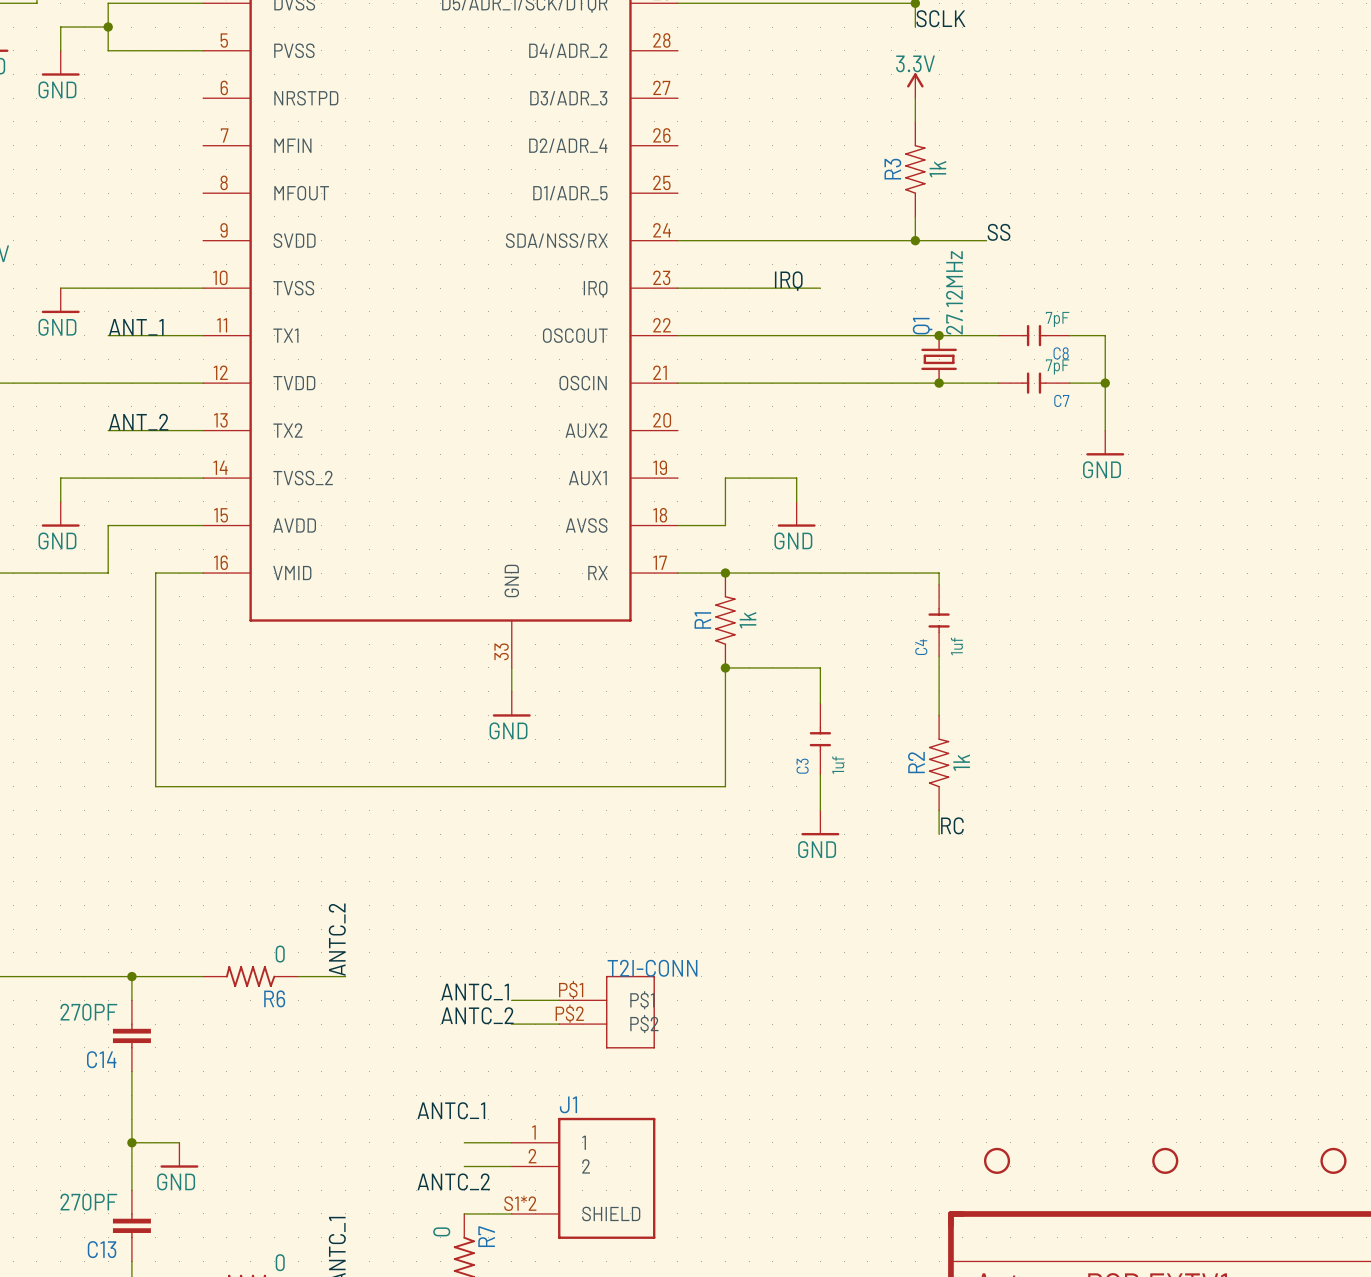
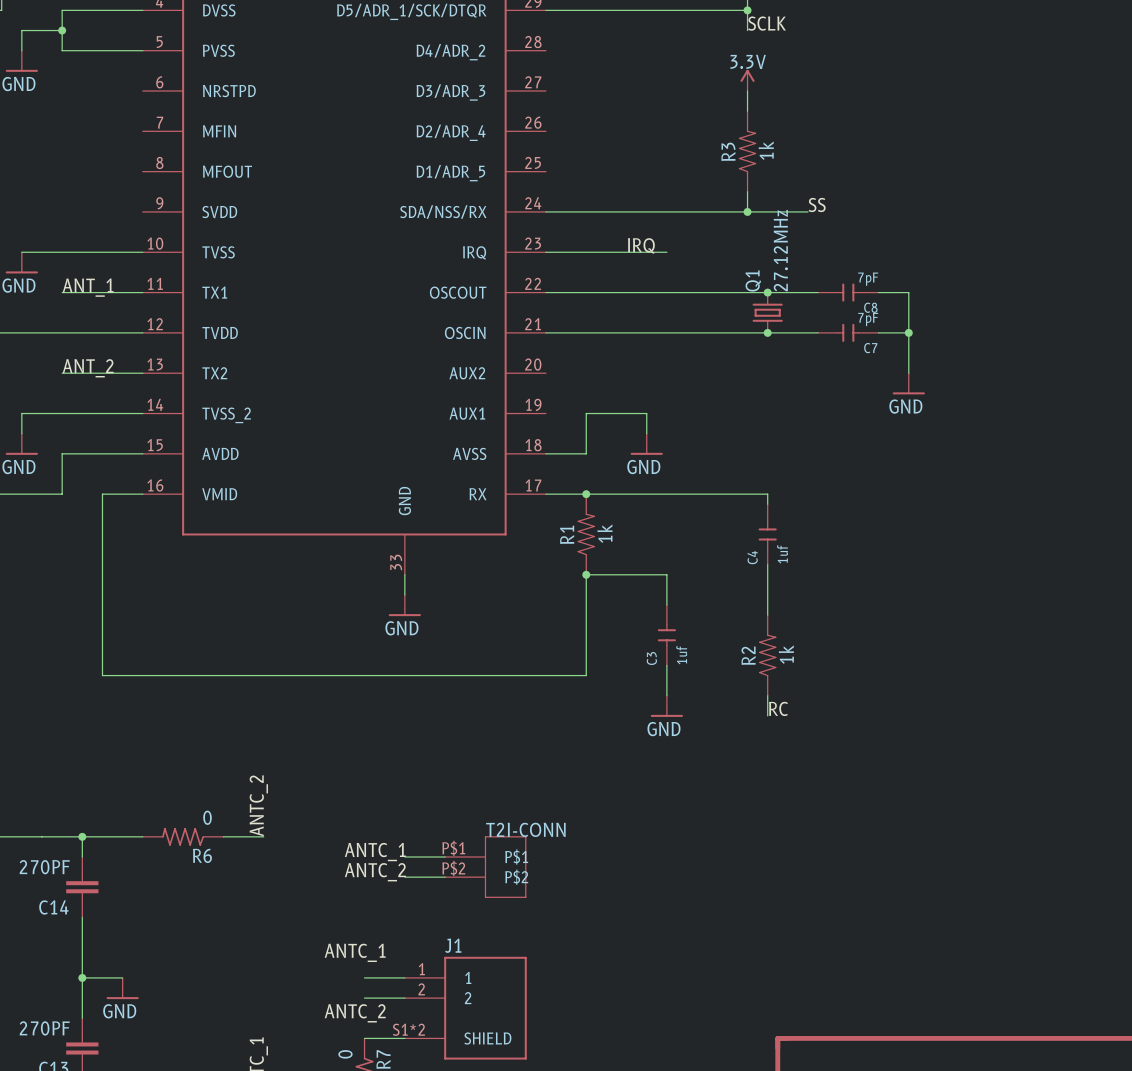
part: (997, 1160) -> none
part: (1165, 1160) -> none
part: (1333, 1160) -> none

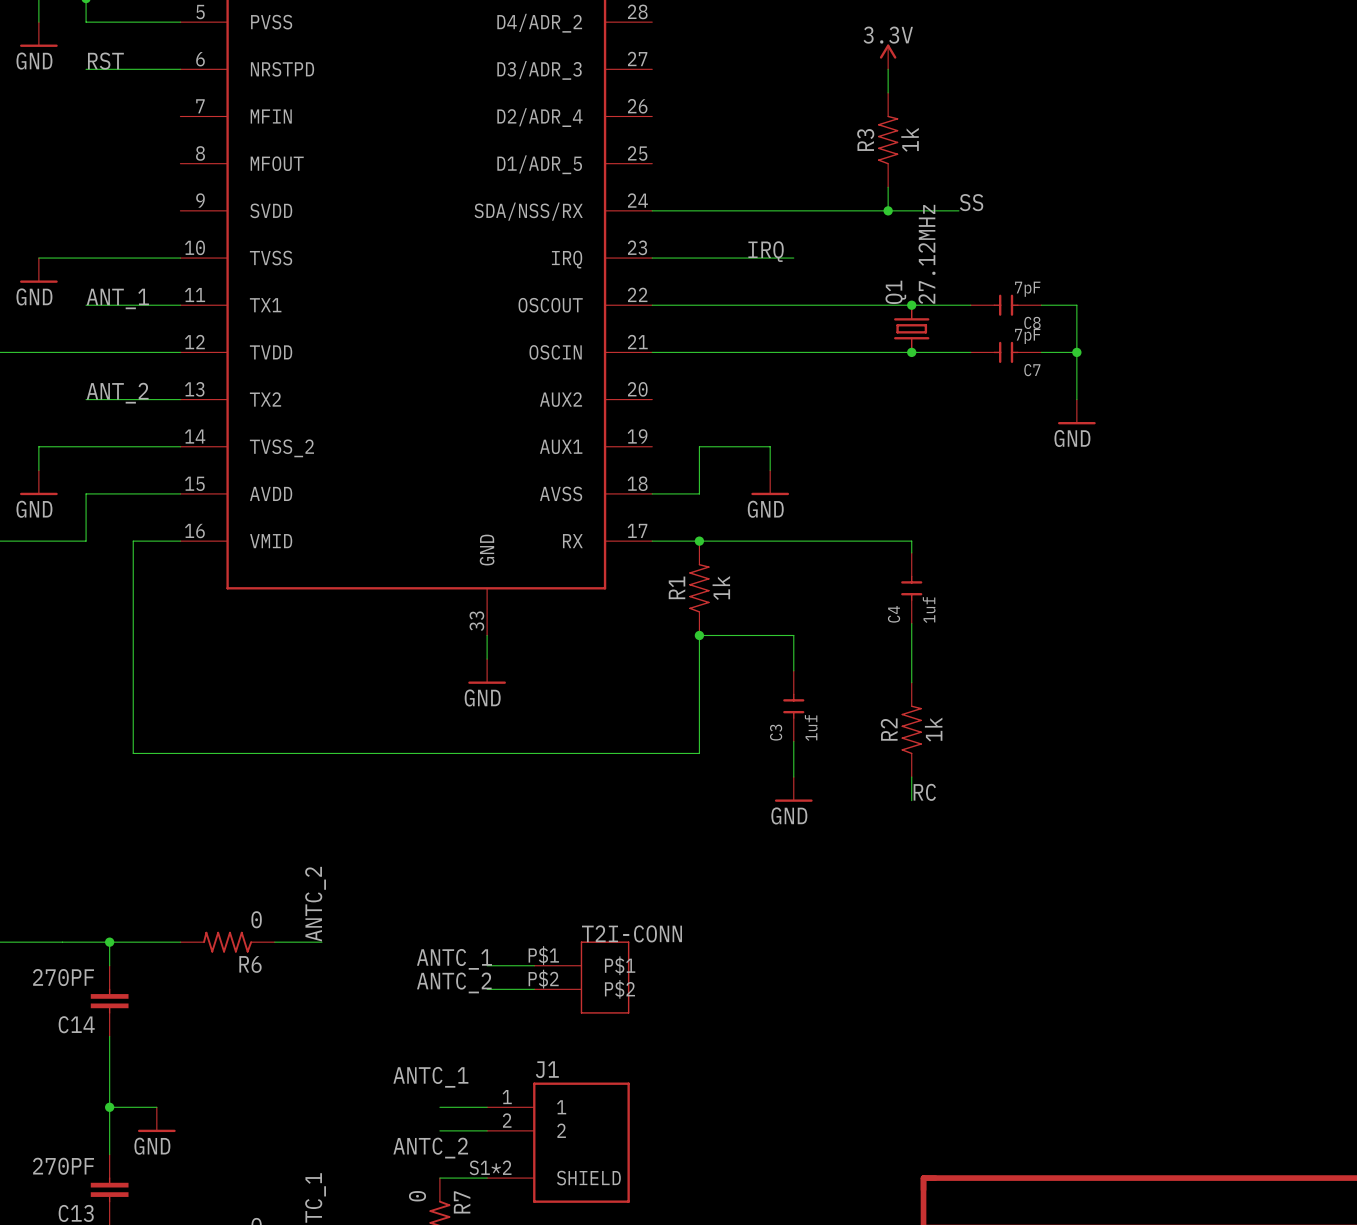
label: none -> RST (105, 61)
wire: none -> (86, 69) (180, 69)

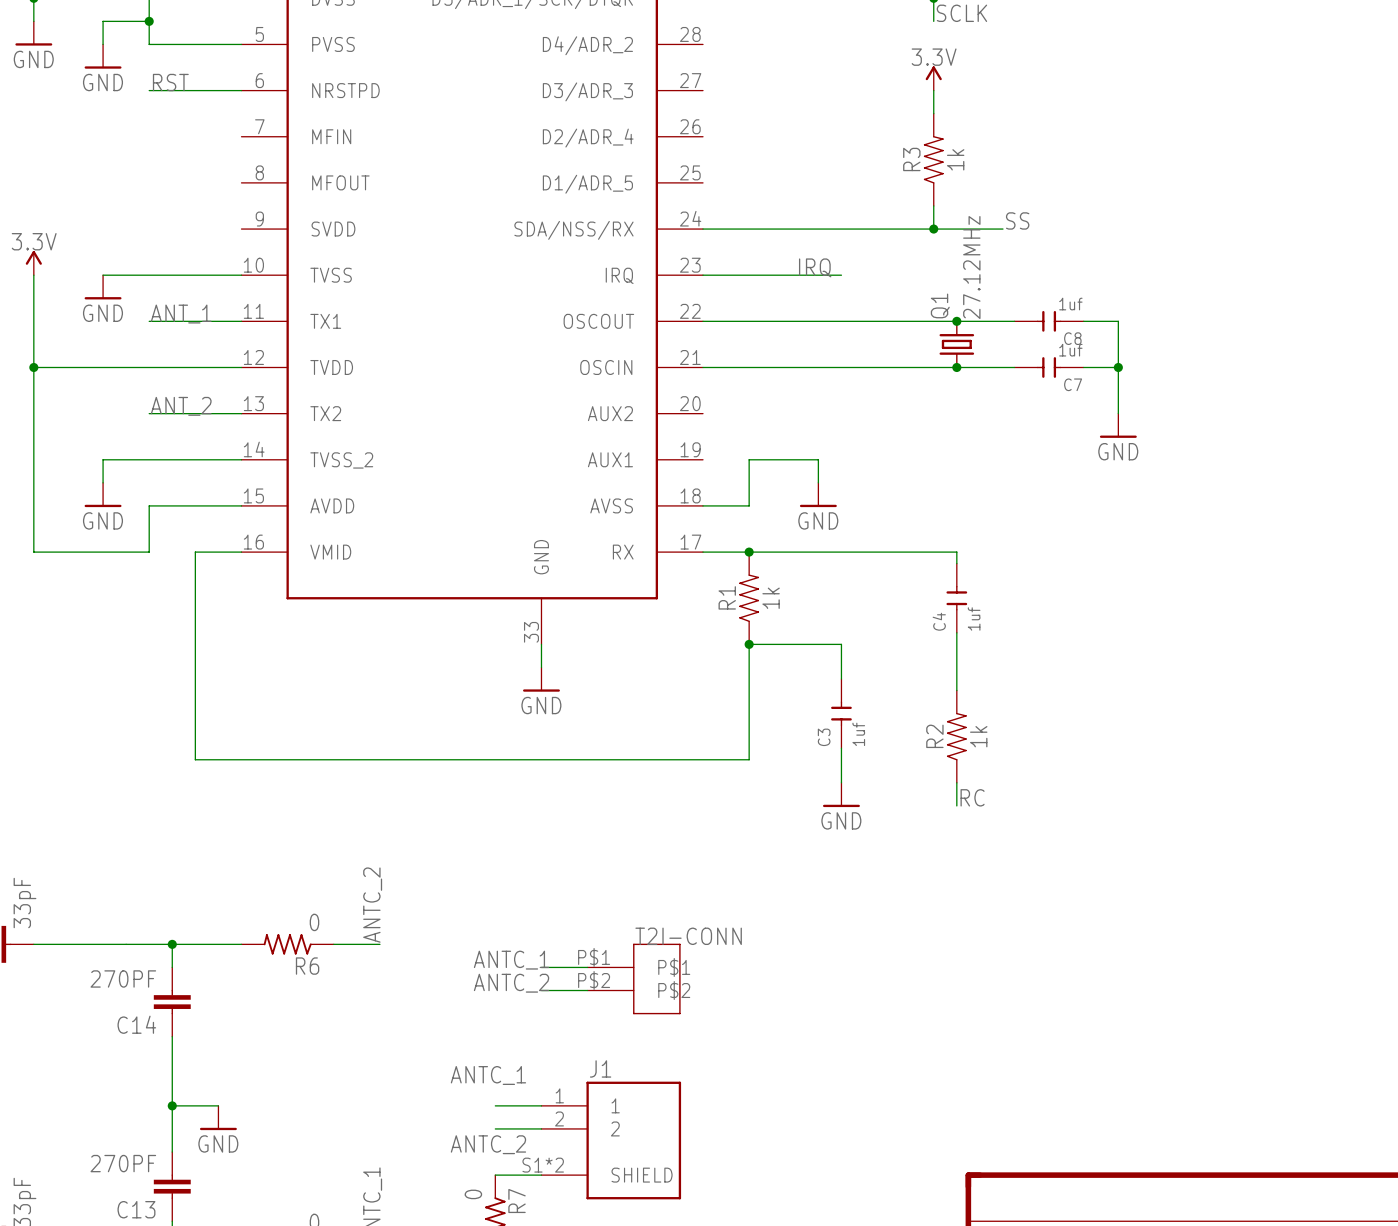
C8 value: 7pF (1027, 289) -> 1uf (1070, 304)
C7 value: 7pF (1027, 336) -> 1uf (1070, 350)

